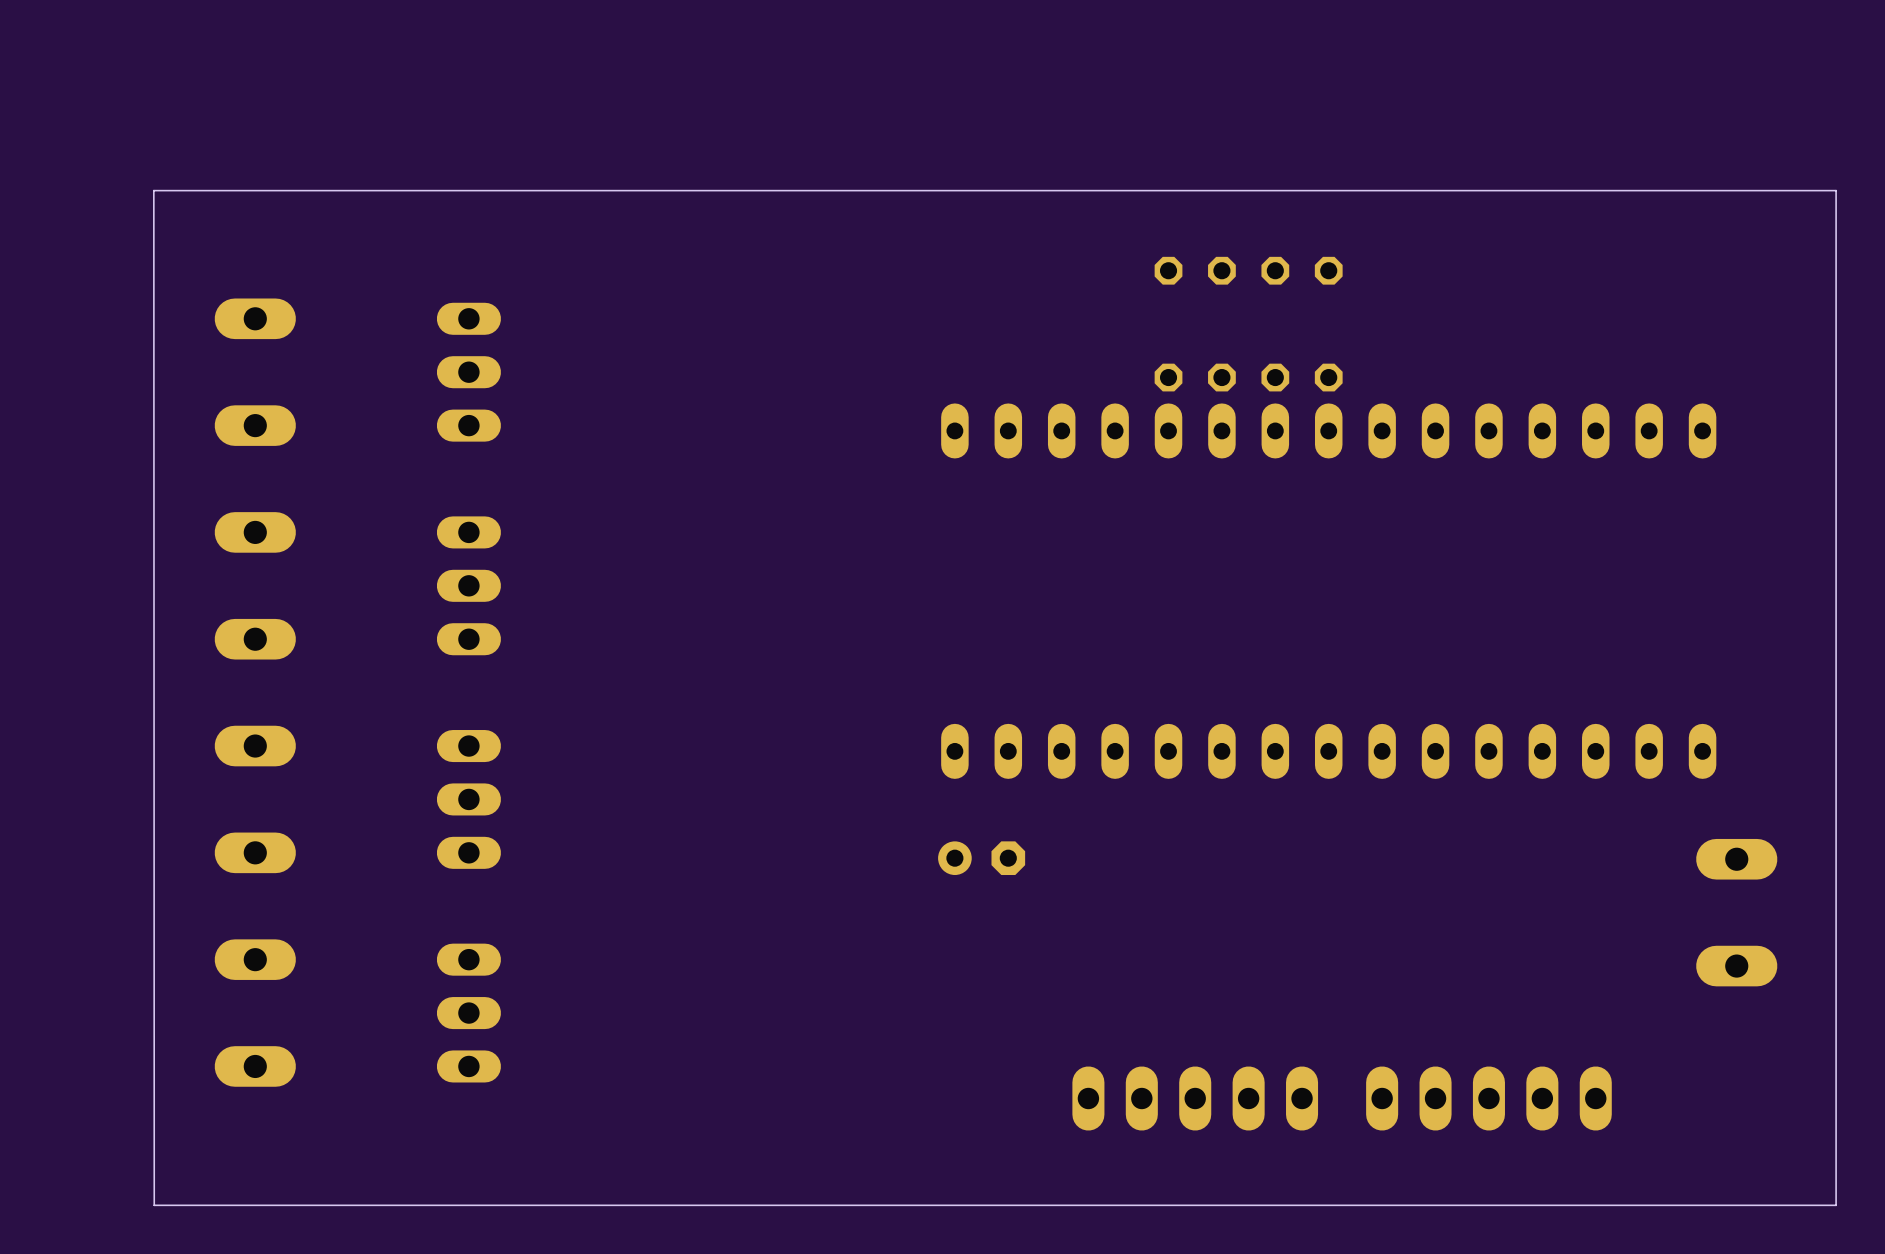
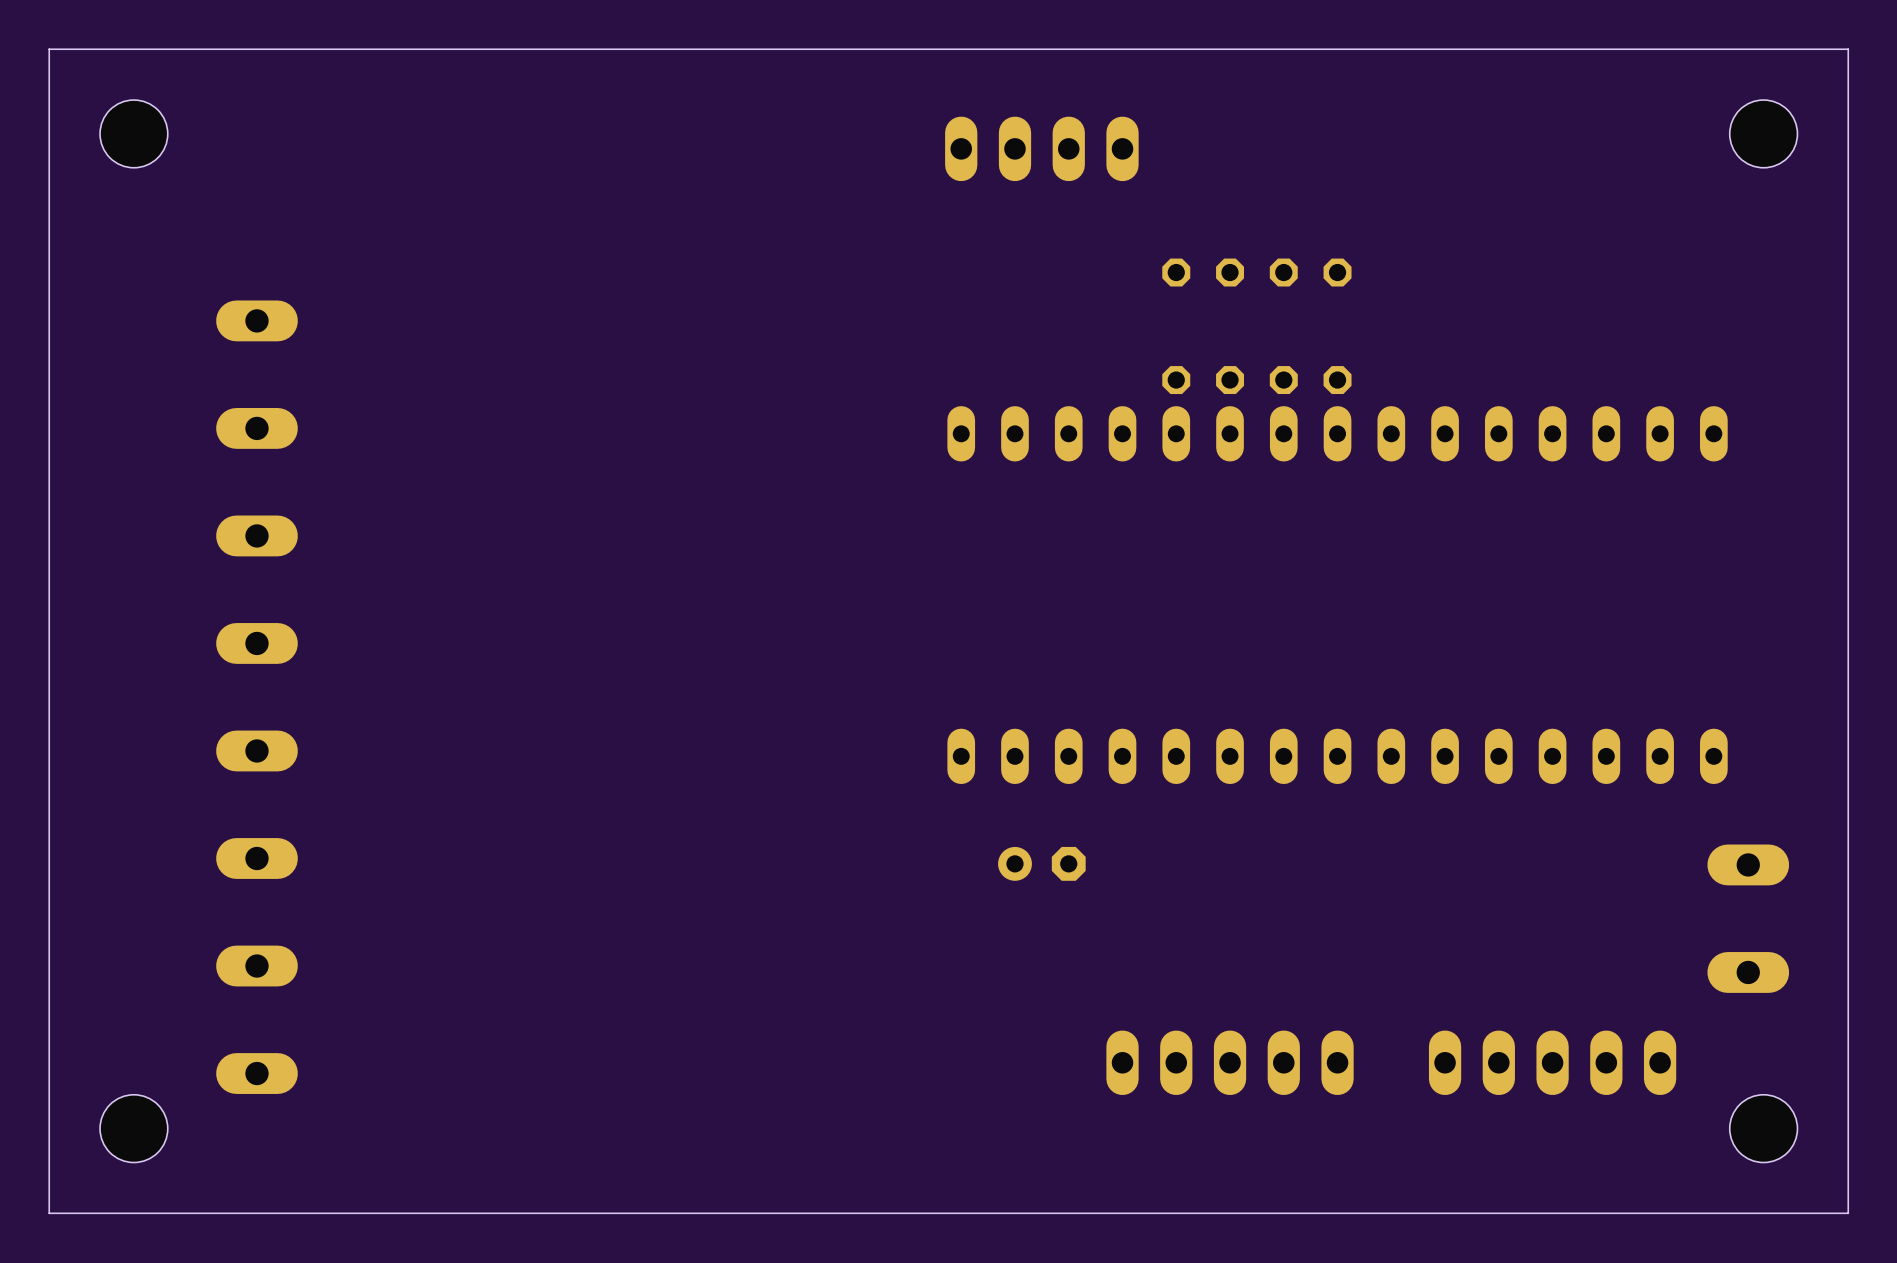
hole: none -> (133, 133)
hole: none -> (1763, 133)
part: none -> (1041, 148)
board edge: (1836, 190) (153, 190) (154, 1205) -> (1848, 191) (1848, 49) (49, 49) (49, 1213) (155, 1213)
part: (468, 372) -> none
part: (468, 585) -> none
part: (468, 799) -> none
part position: (981, 858) -> (1041, 863)
part: (468, 1013) -> none
part position: (1195, 1098) -> (1230, 1062)
part position: (1488, 1098) -> (1552, 1062)
hole: none -> (133, 1128)
hole: none -> (1763, 1128)

